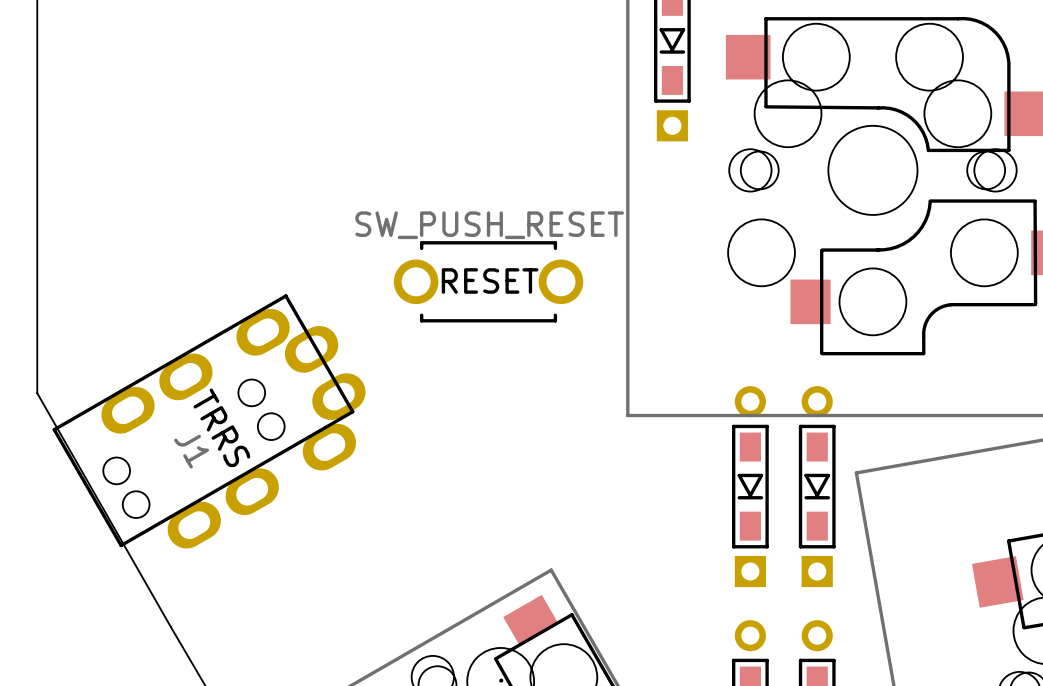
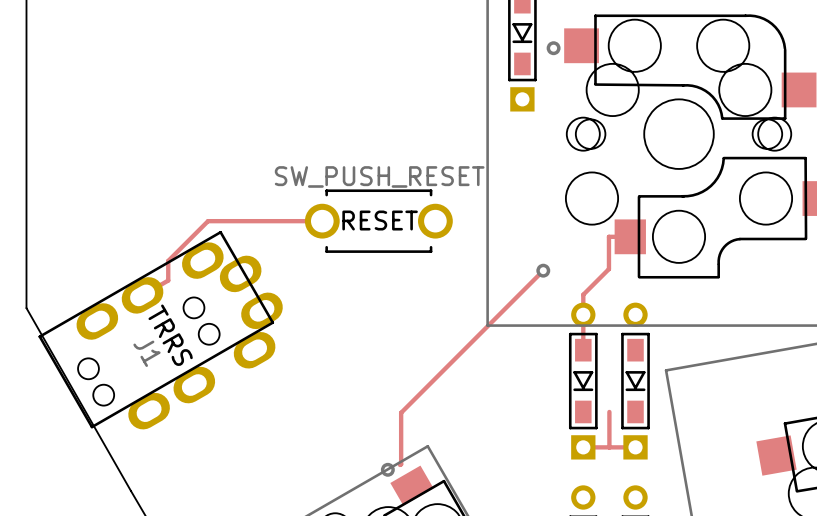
via: none -> (553, 48)
track: none -> (322, 221) (208, 221) (168, 260) (168, 280) (142, 295)
track: none -> (630, 236) (608, 236) (608, 269) (583, 294) (583, 350)
track: none -> (543, 270) (401, 412) (400, 465)
via: none -> (543, 270)
track: none -> (609, 411) (609, 447)
track: none -> (583, 447) (635, 447)
via: none -> (387, 469)

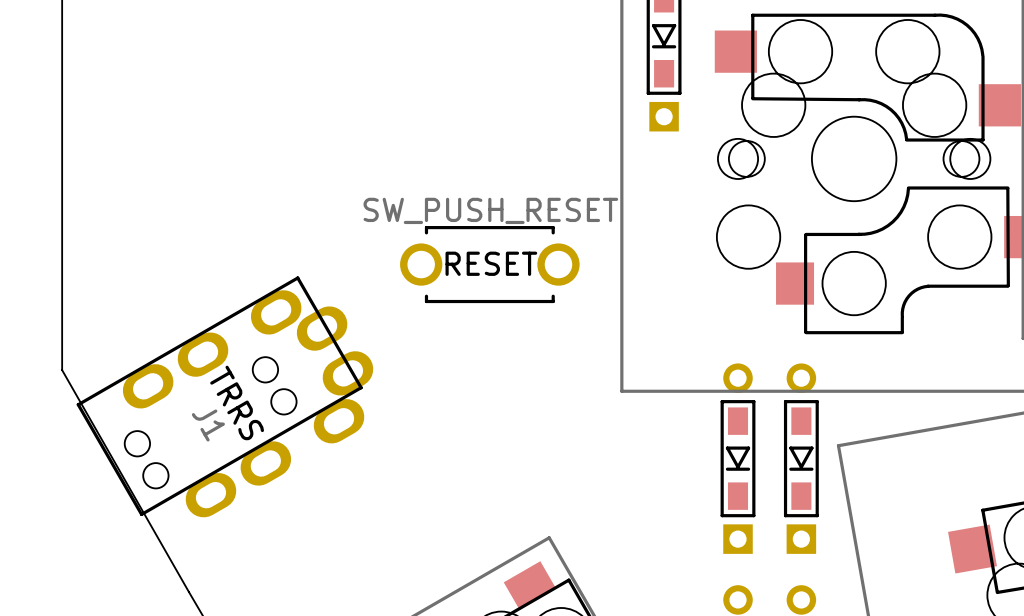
via: (553, 48) -> none
track: (322, 221) (208, 221) (168, 260) (168, 280) (142, 295) -> none
track: (630, 236) (608, 236) (608, 269) (583, 294) (583, 350) -> none
track: (543, 270) (401, 412) (400, 465) -> none
via: (543, 270) -> none
track: (609, 411) (609, 447) -> none
track: (583, 447) (635, 447) -> none
via: (387, 469) -> none

